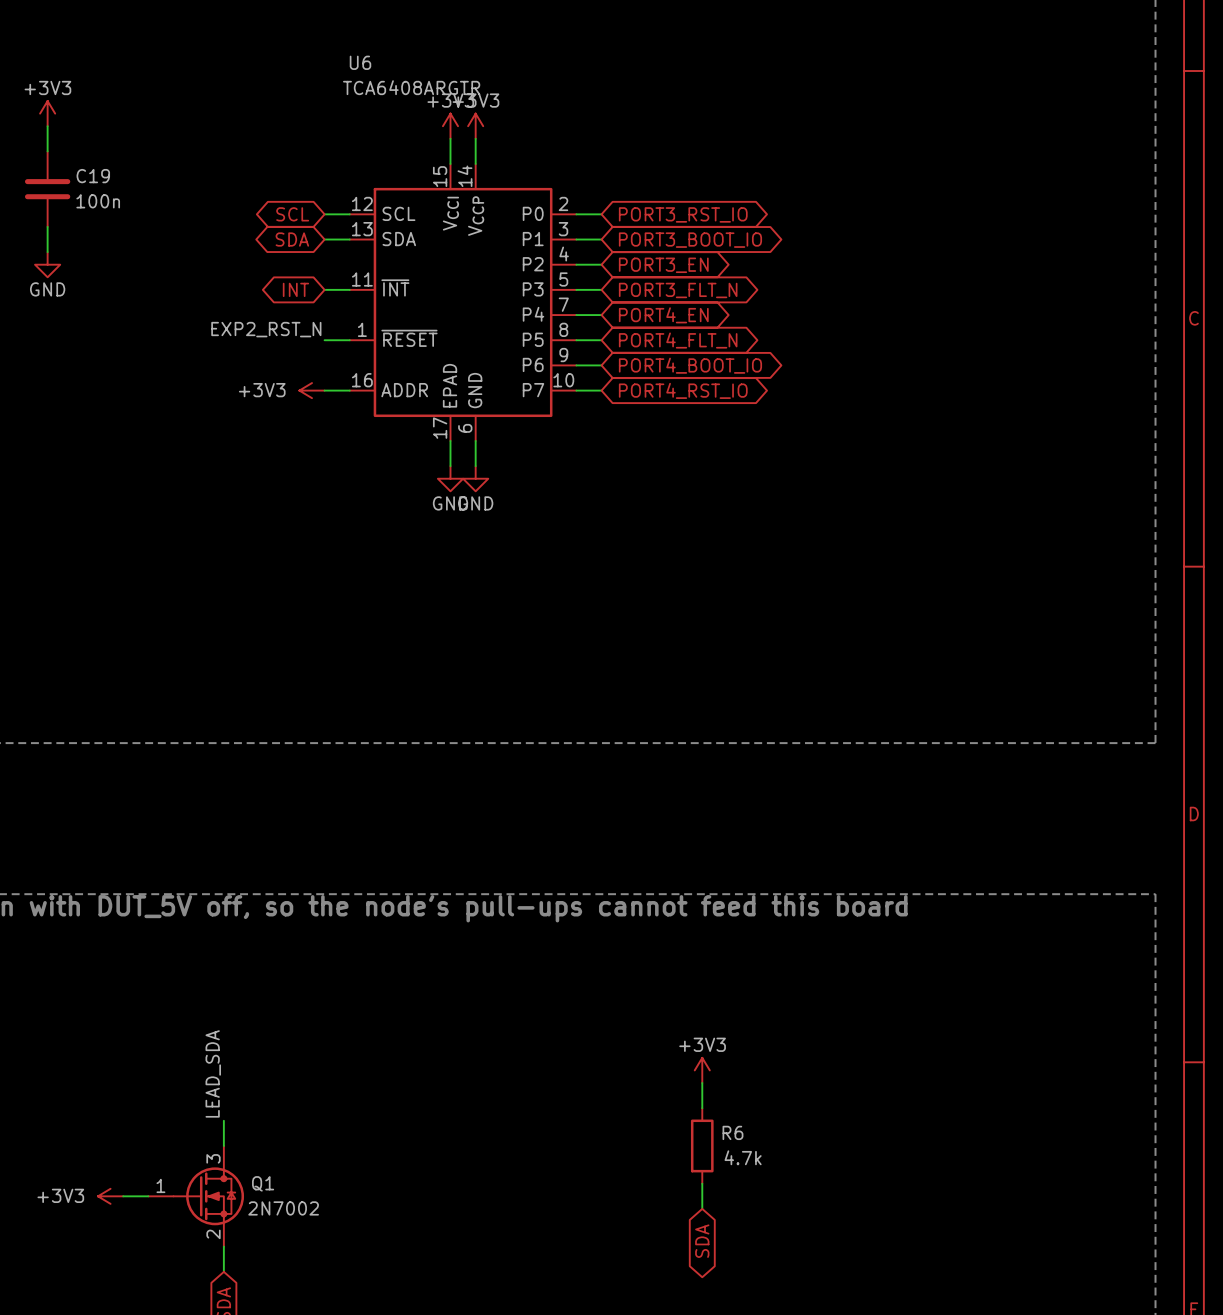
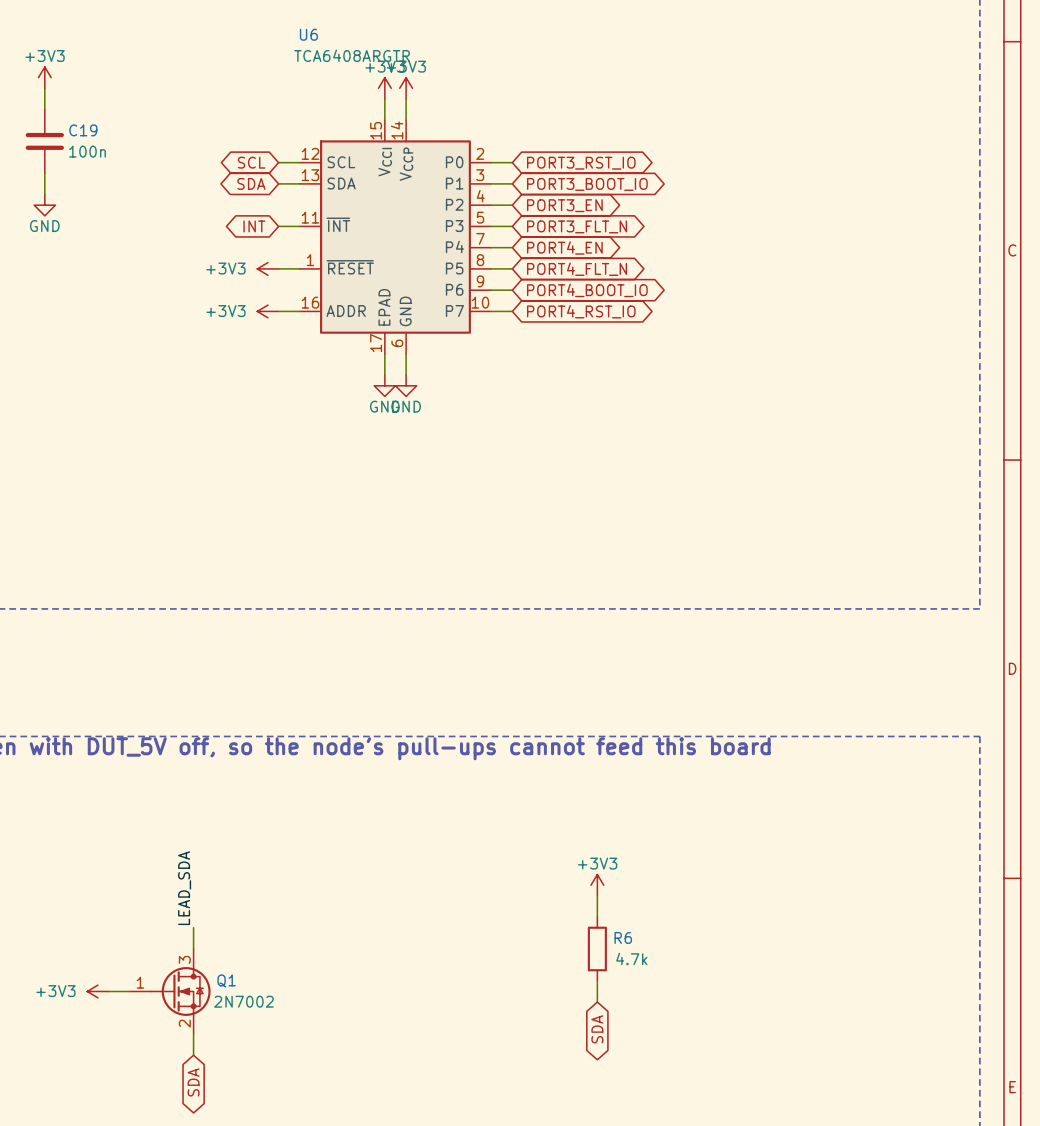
label: EXP2_RST_N (266, 329) -> none
power symbol: none -> +3V3 (267, 268)

